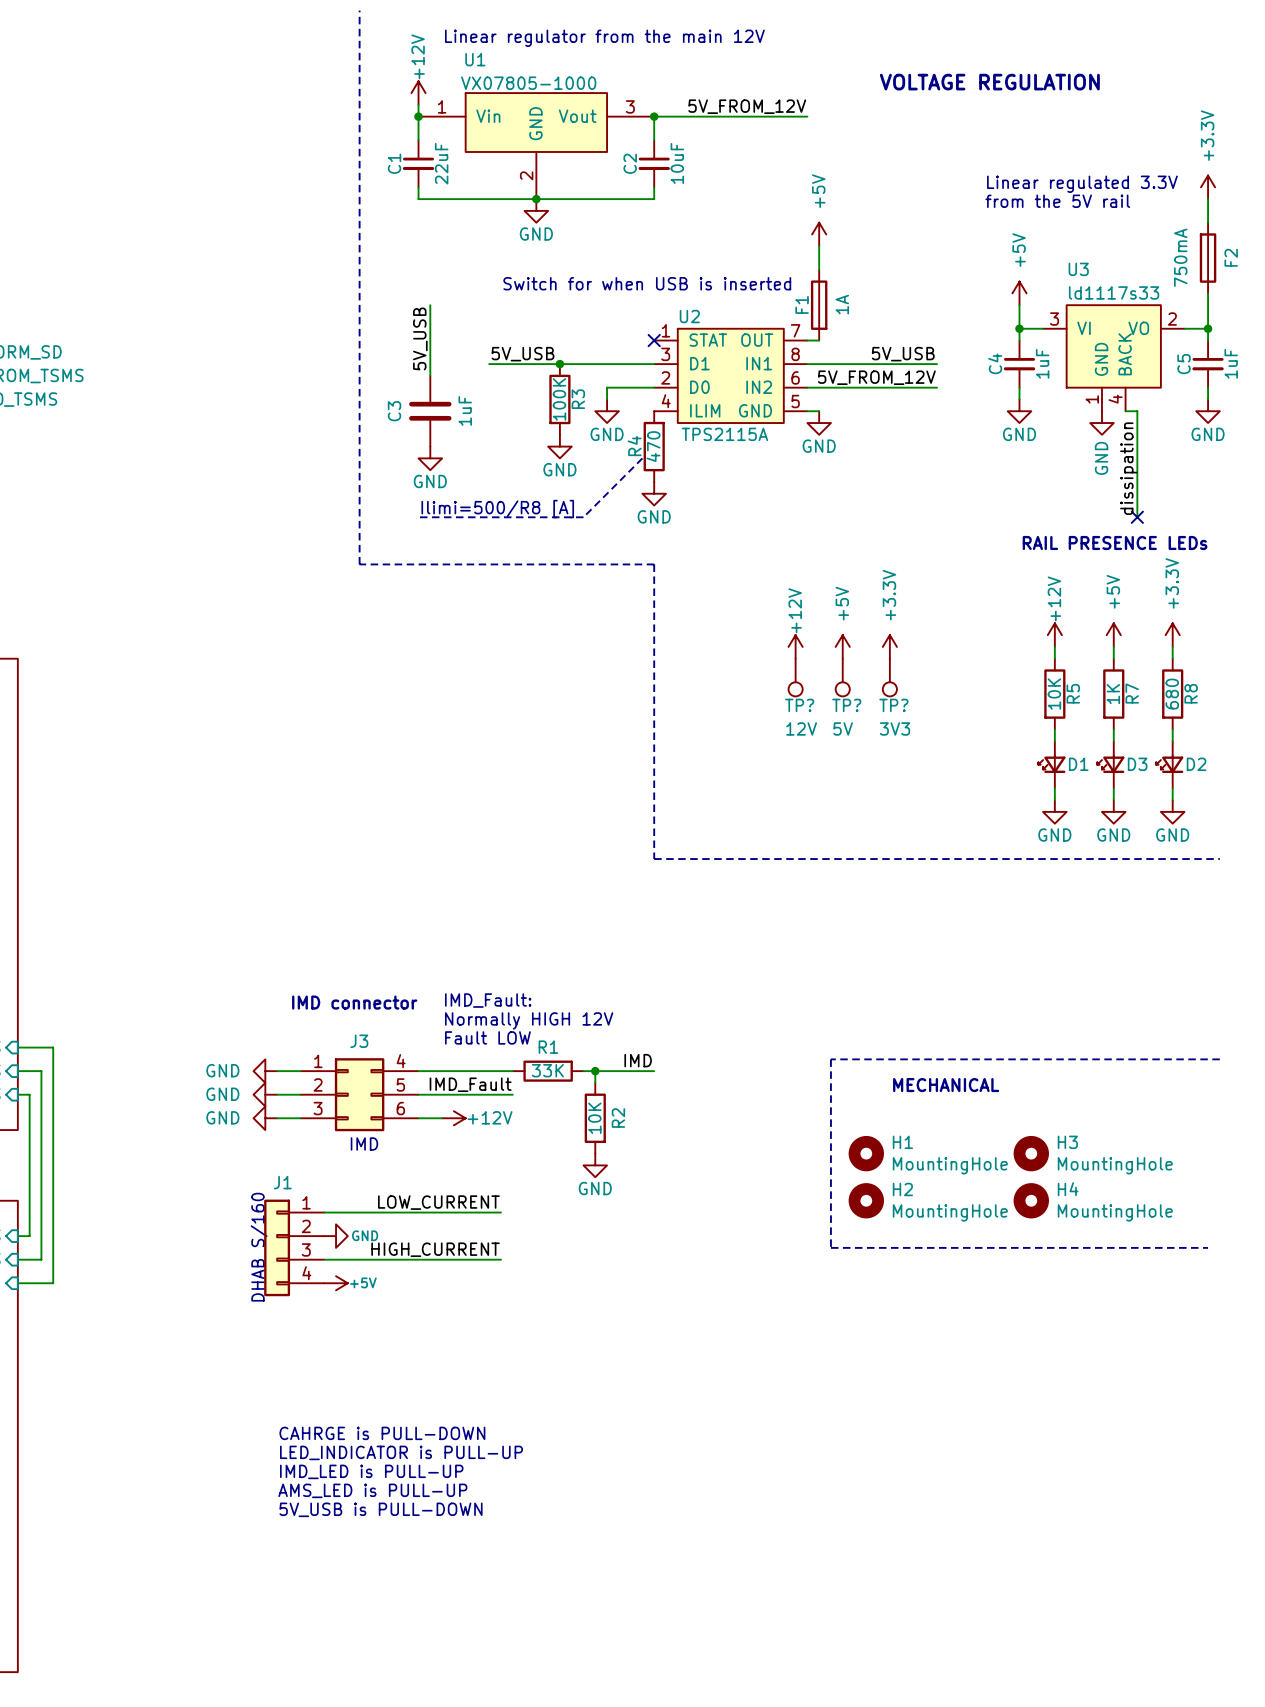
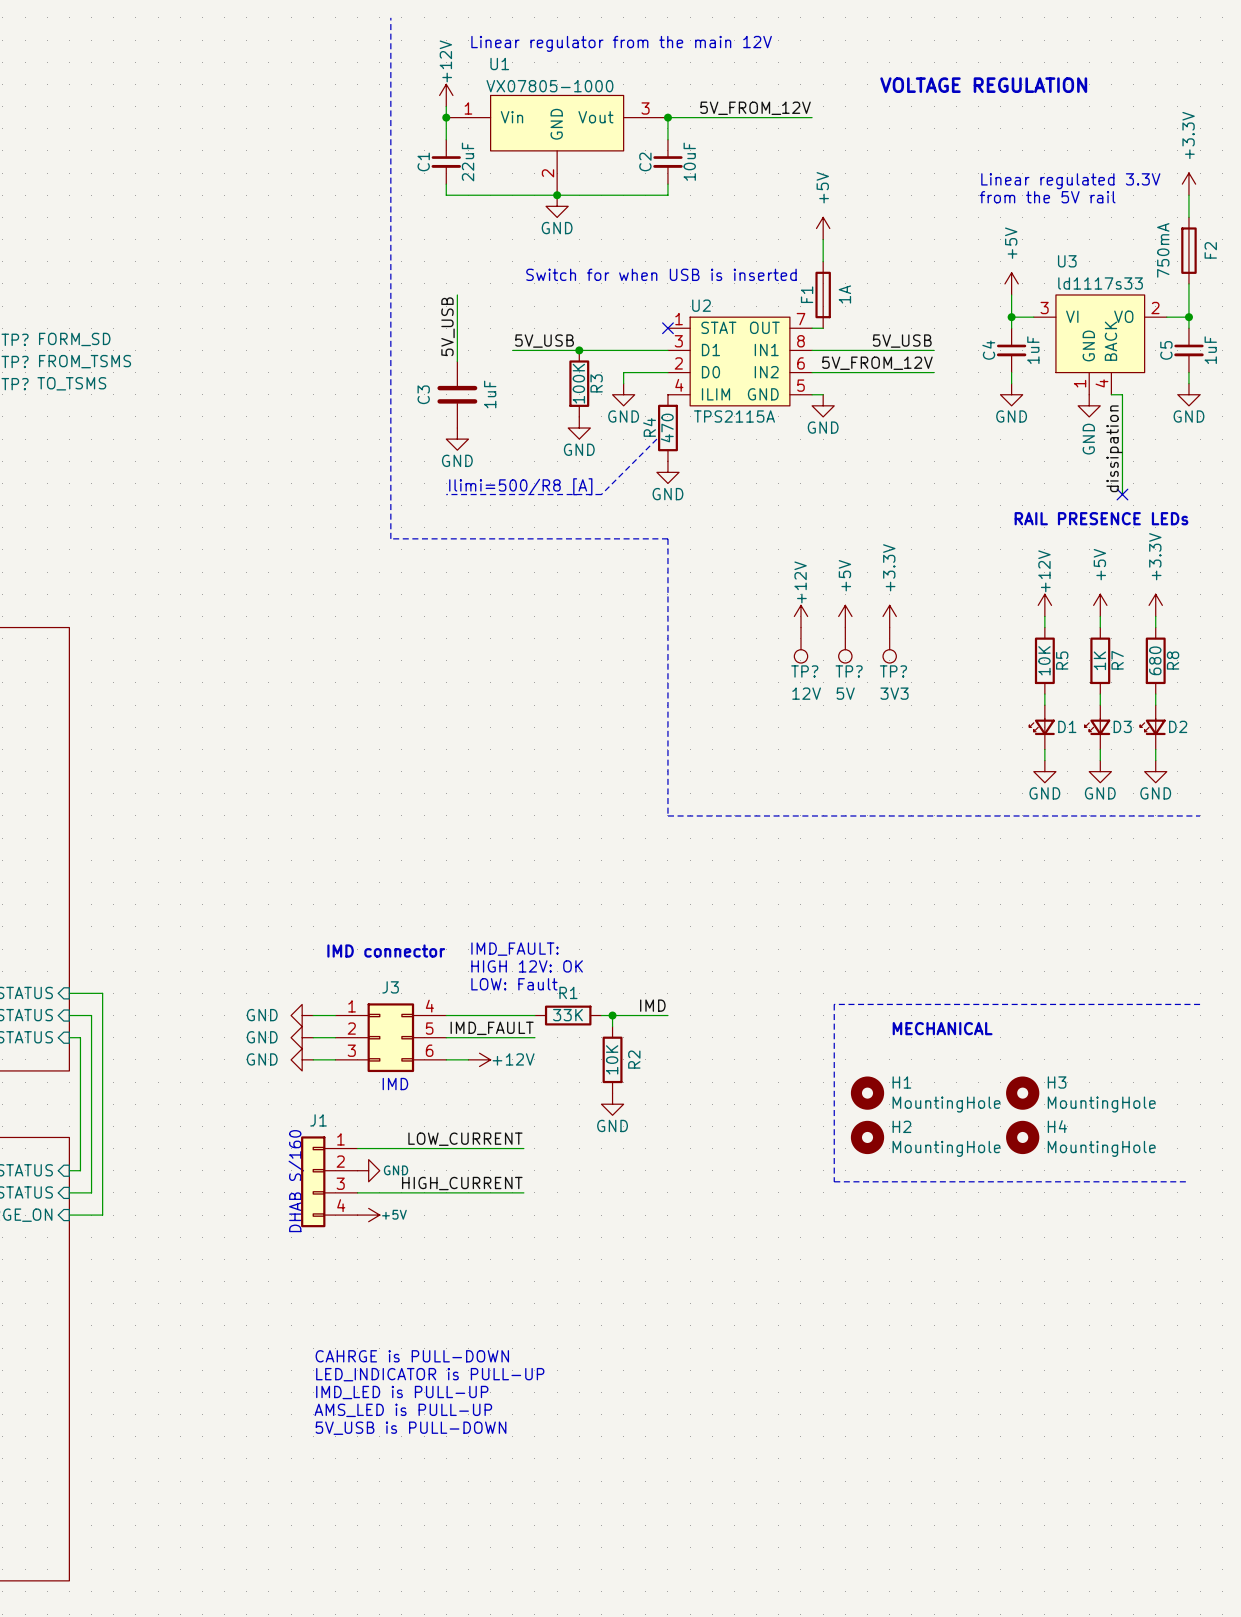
text: IMD_Fault: (488, 1000) -> IMD_FAULT: (514, 949)
text: Normally HIGH 12V (529, 1020) -> HIGH 12V: OK (527, 966)
text: Fault LOW (487, 1037) -> LOW: Fault (514, 984)
label: IMD_Fault (470, 1084) -> IMD_FAULT (492, 1028)

